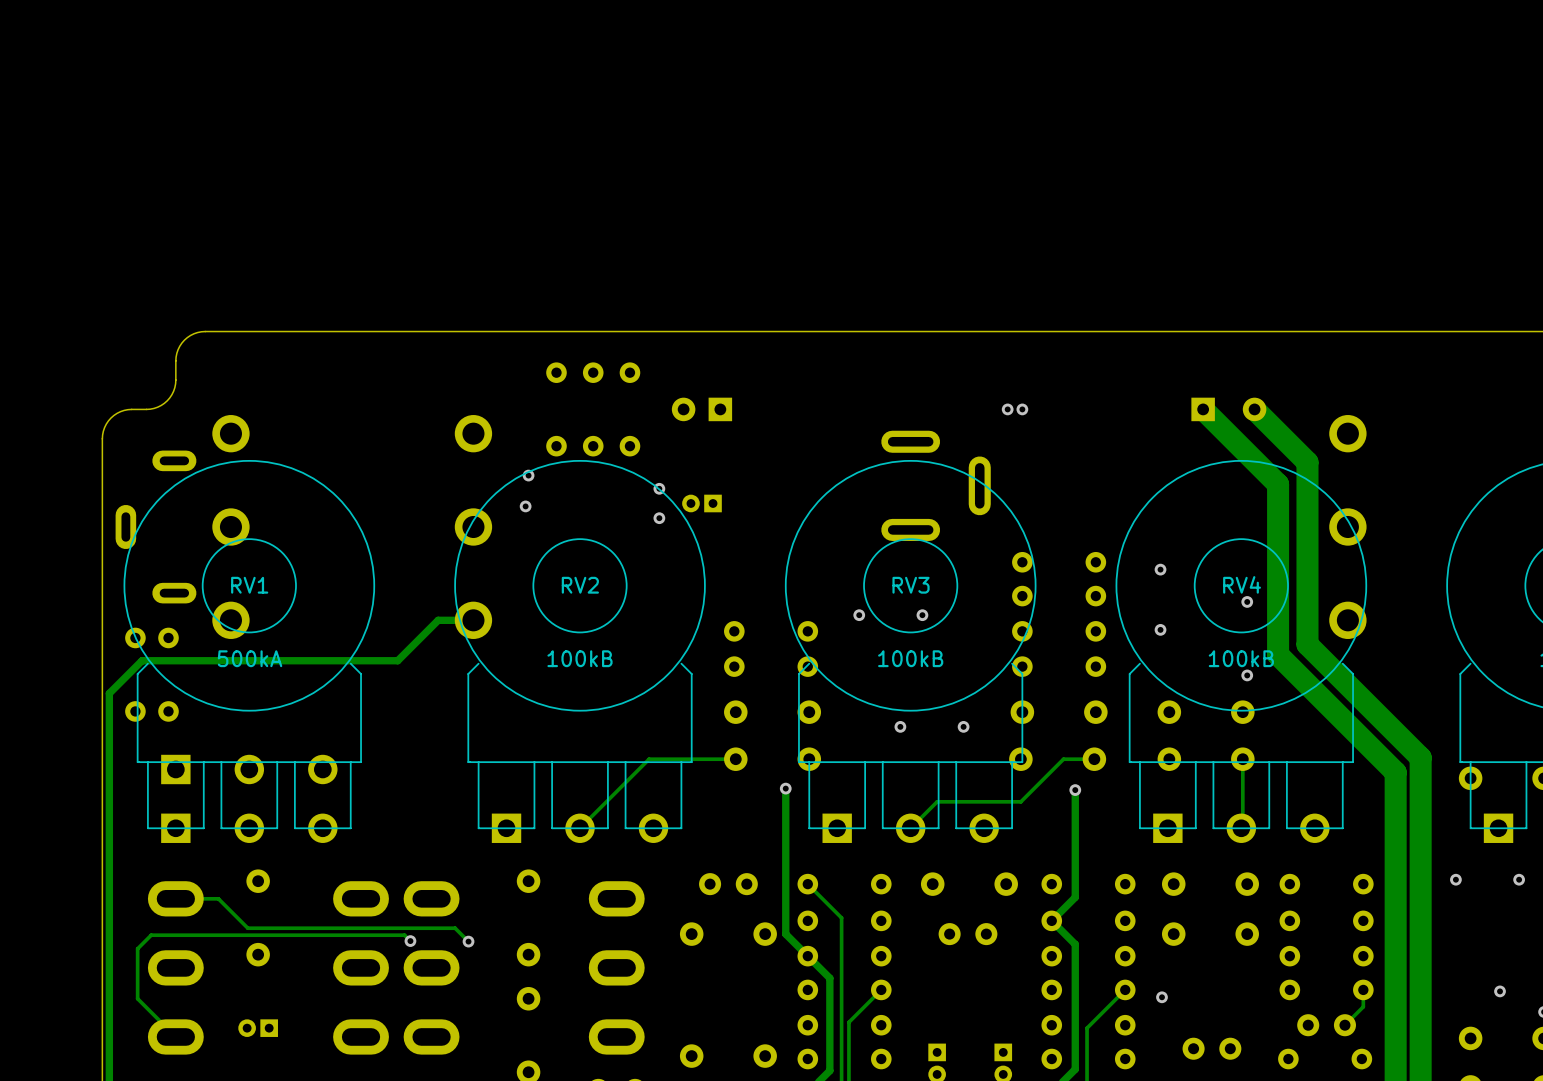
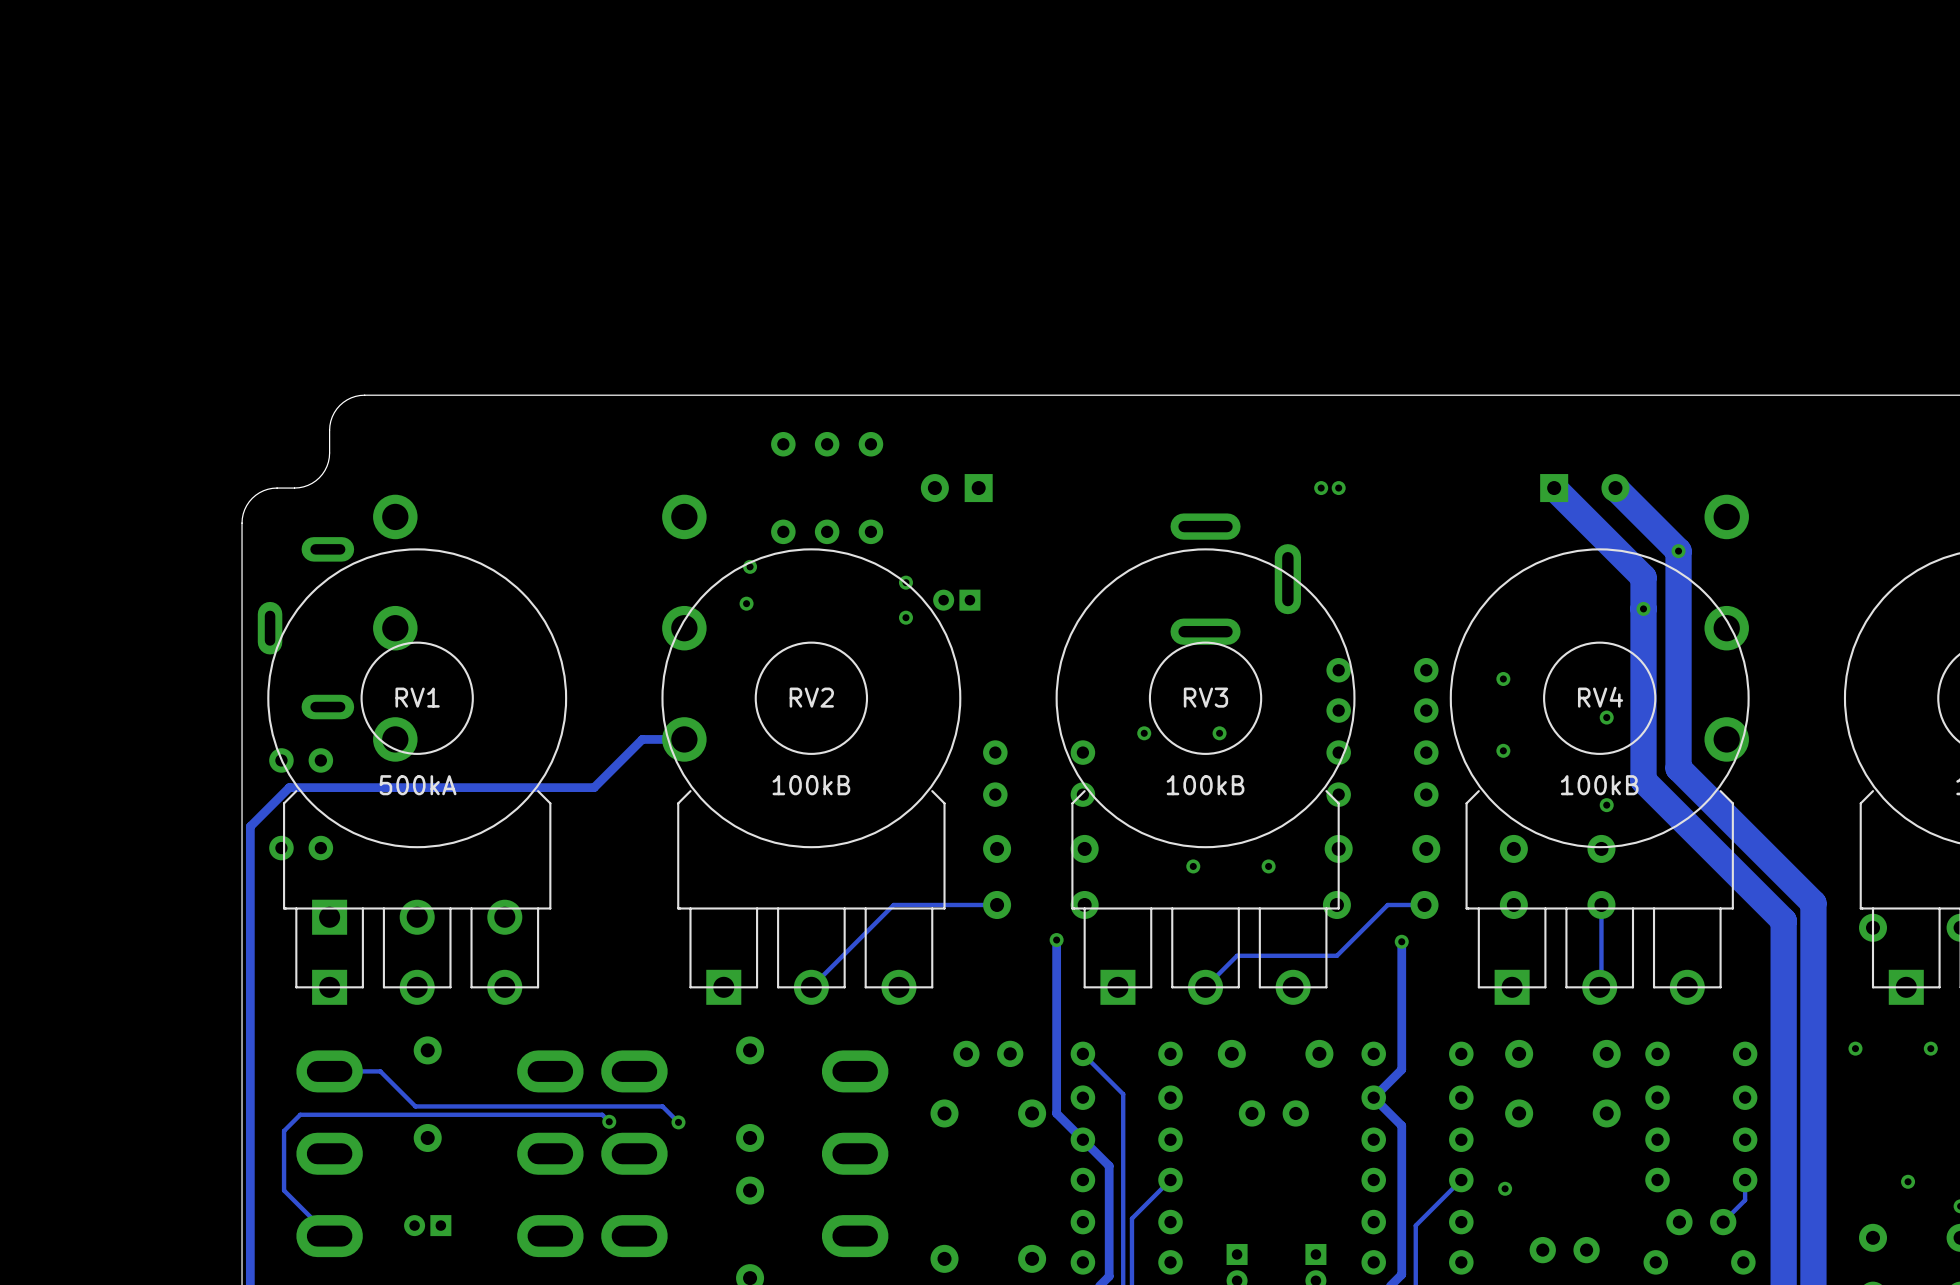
via: none -> (1678, 551)
via: none -> (1643, 608)

